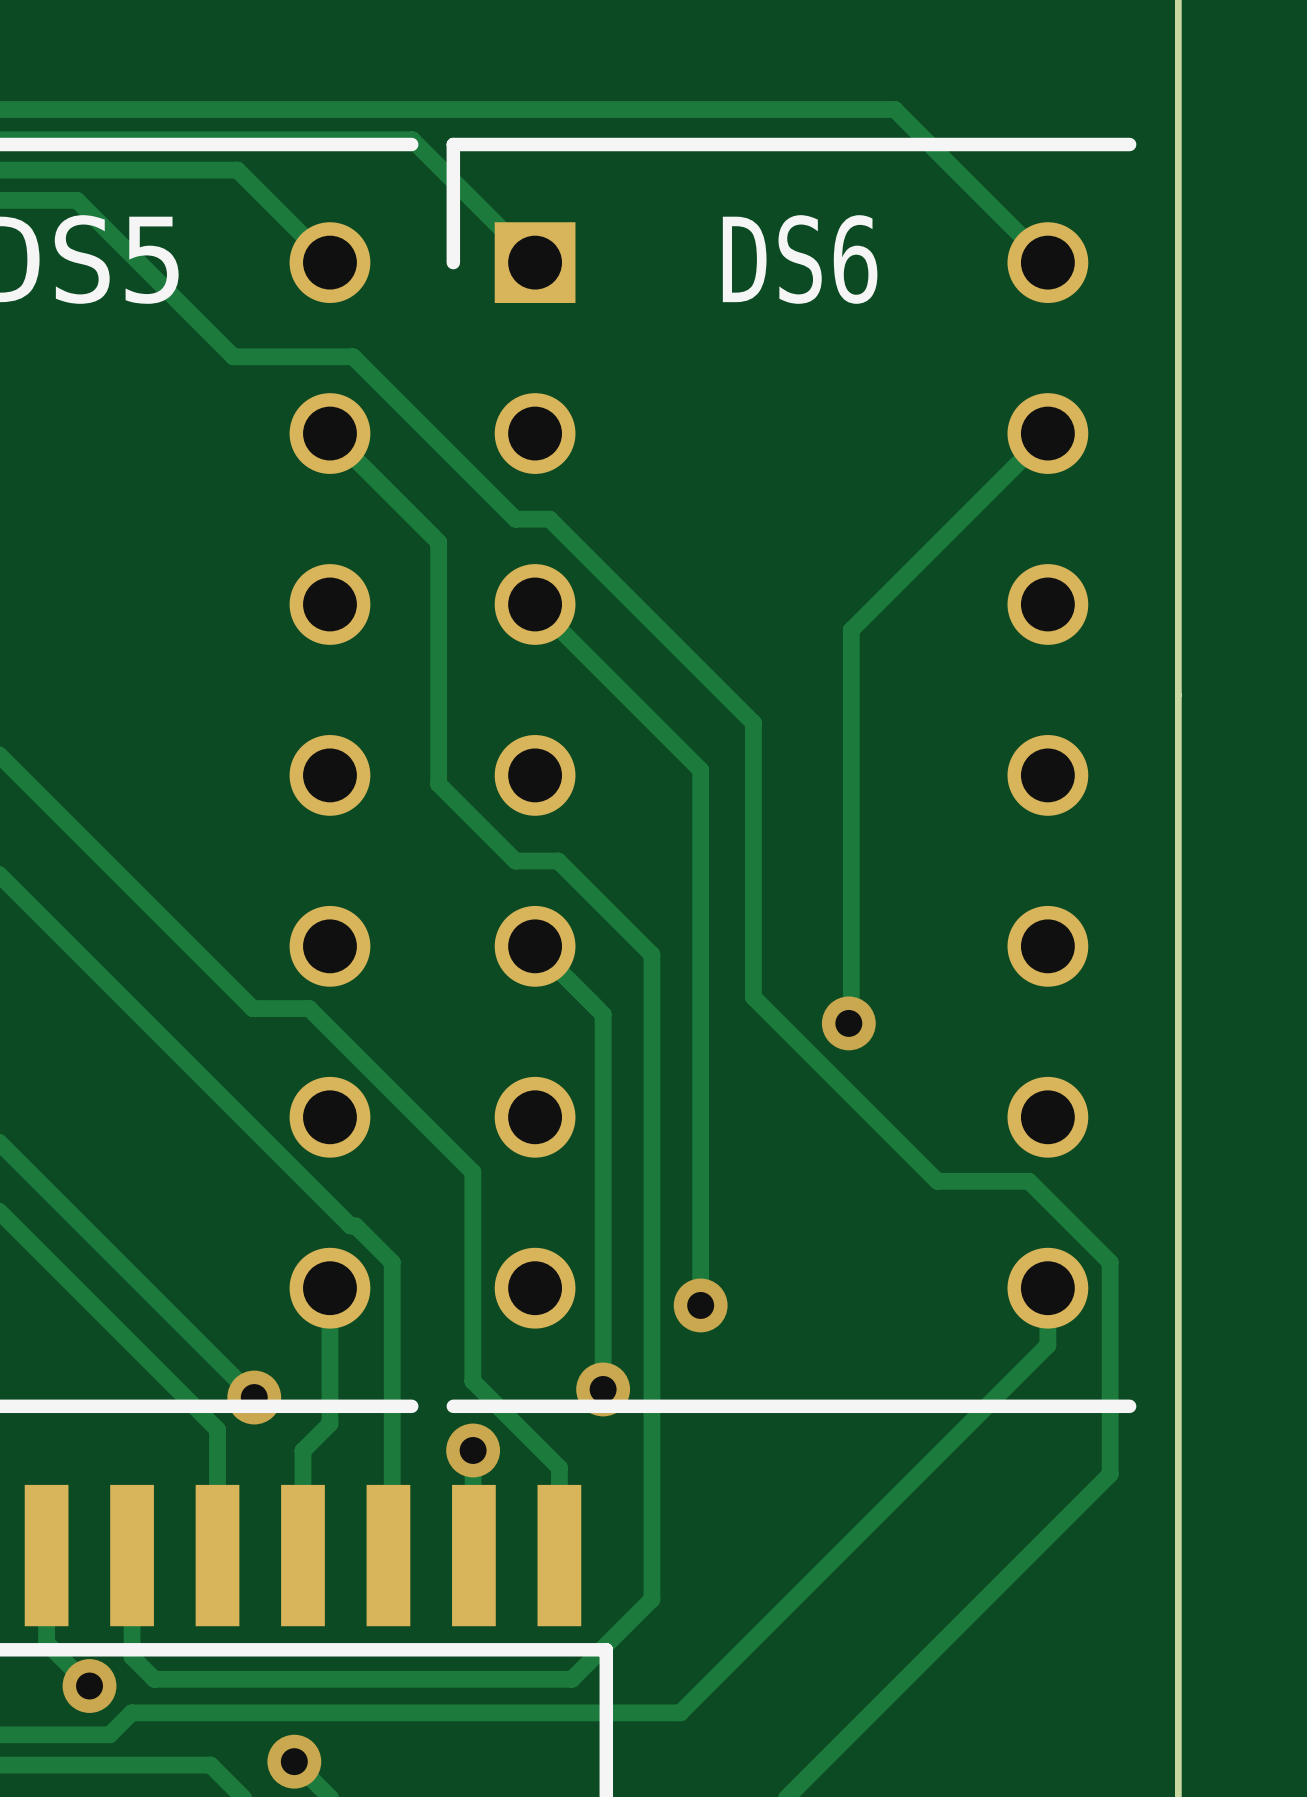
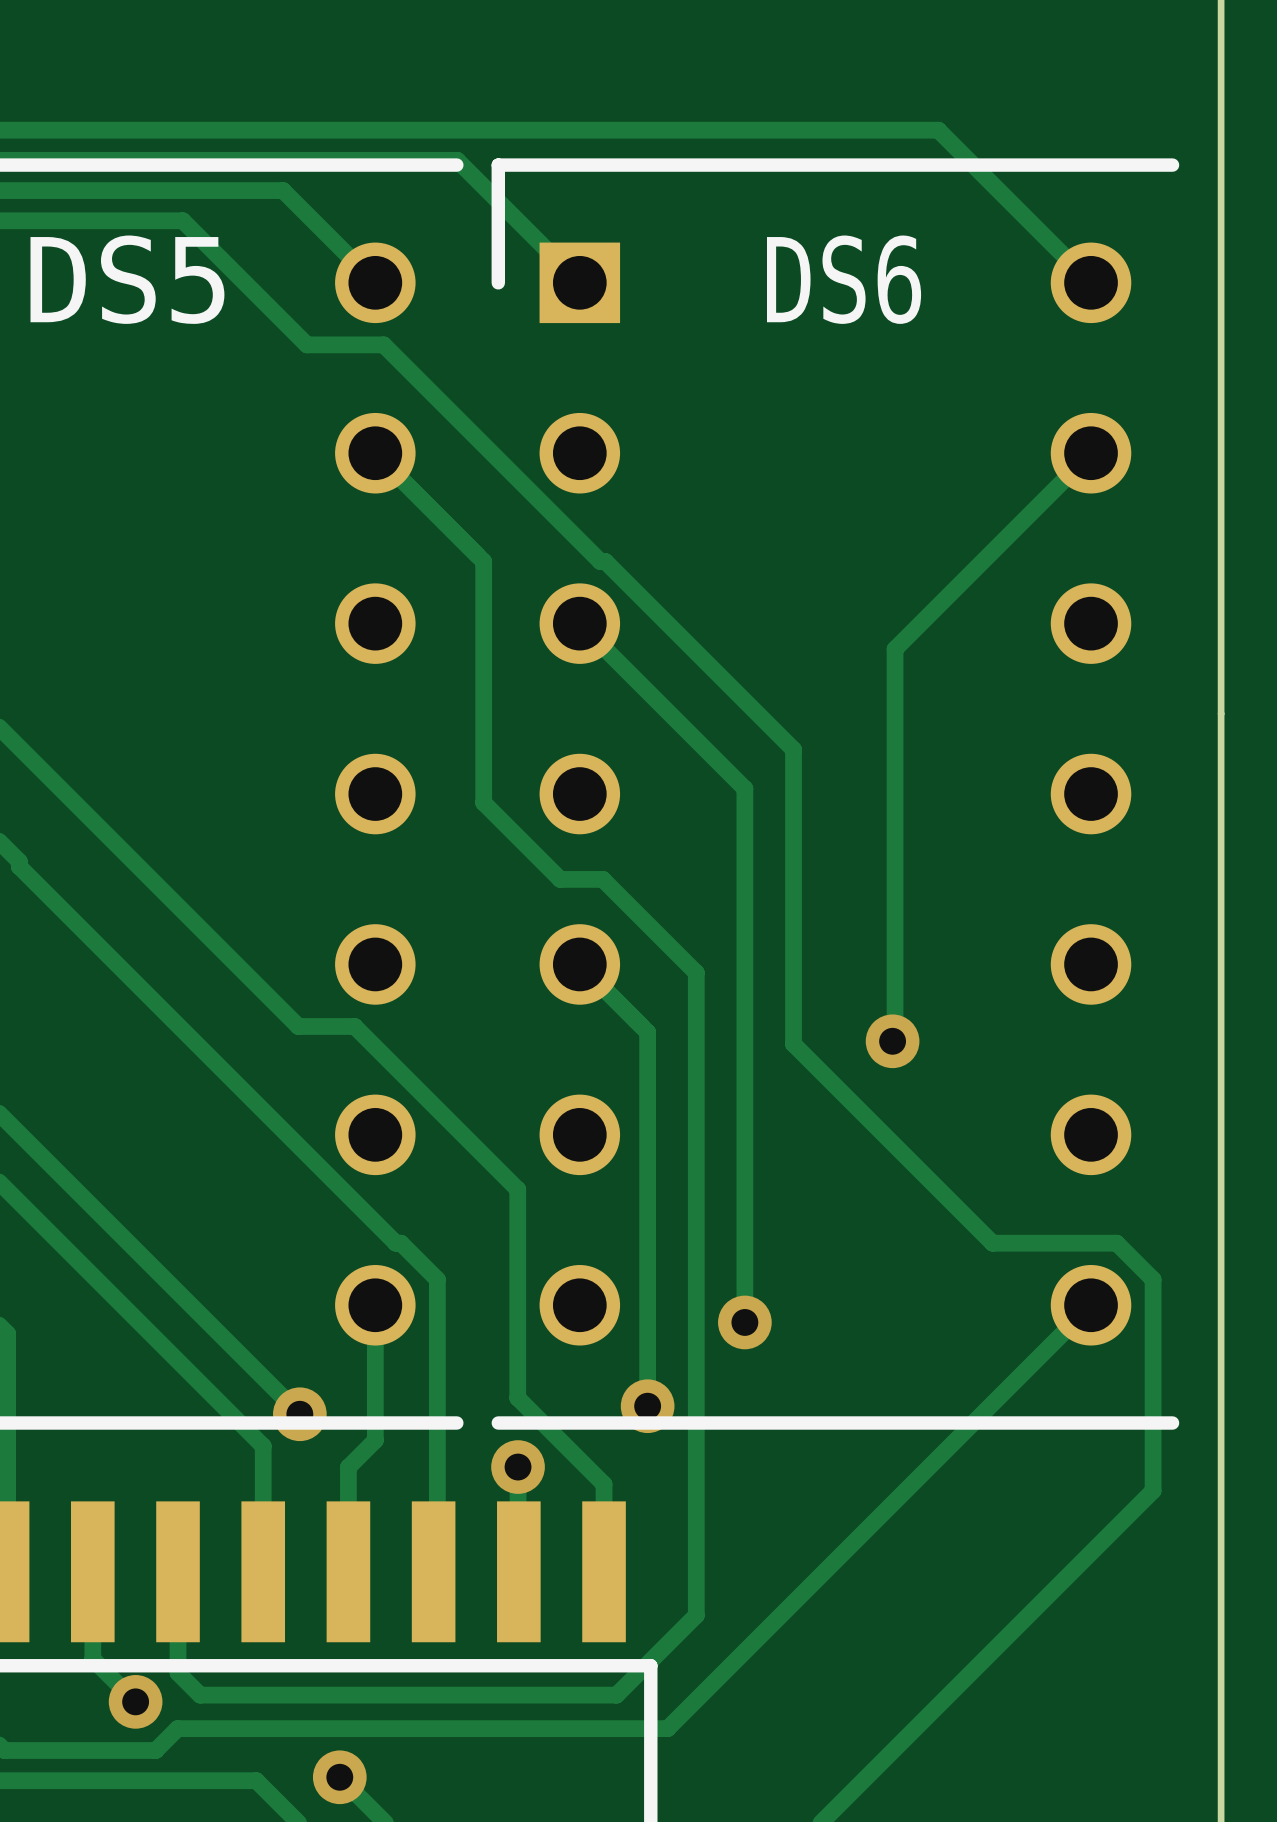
track: (77, 200) (233, 356) (353, 356) (515, 519) (549, 519) (753, 722) (753, 997) (937, 1181) (1029, 1181) (1073, 1225) -> (123, 220) (182, 220) (306, 344) (383, 344) (600, 561) (605, 561) (793, 749) (793, 1044) (992, 1243) (1116, 1243)
track: (1047, 1288) (1047, 1345) (680, 1712) (623, 1712) -> (1091, 1305) (667, 1728)

